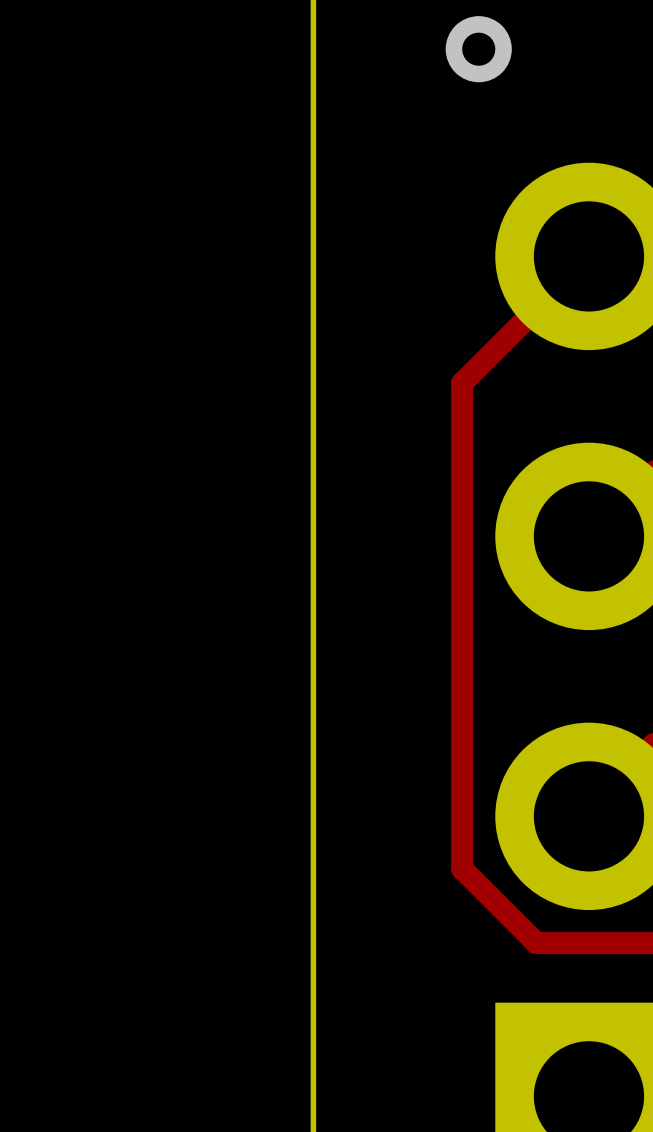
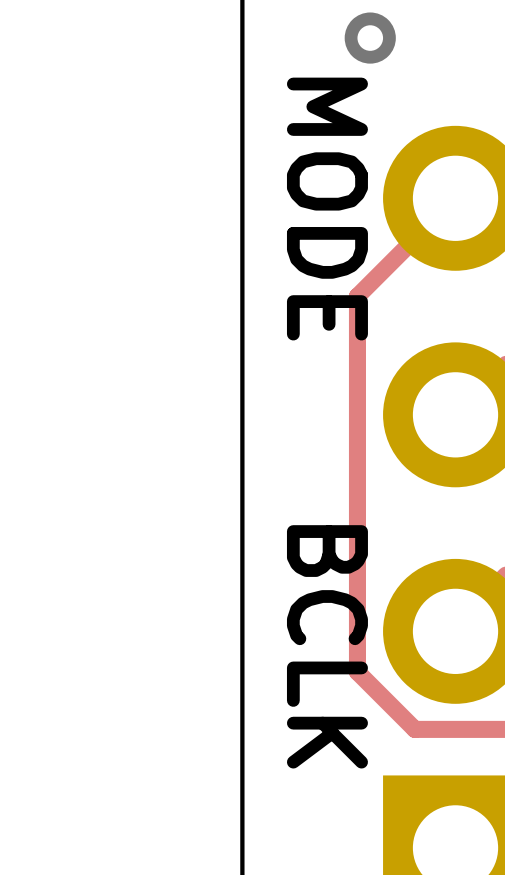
text: none -> MODE (327, 209)
text: none -> BCLK (327, 646)

